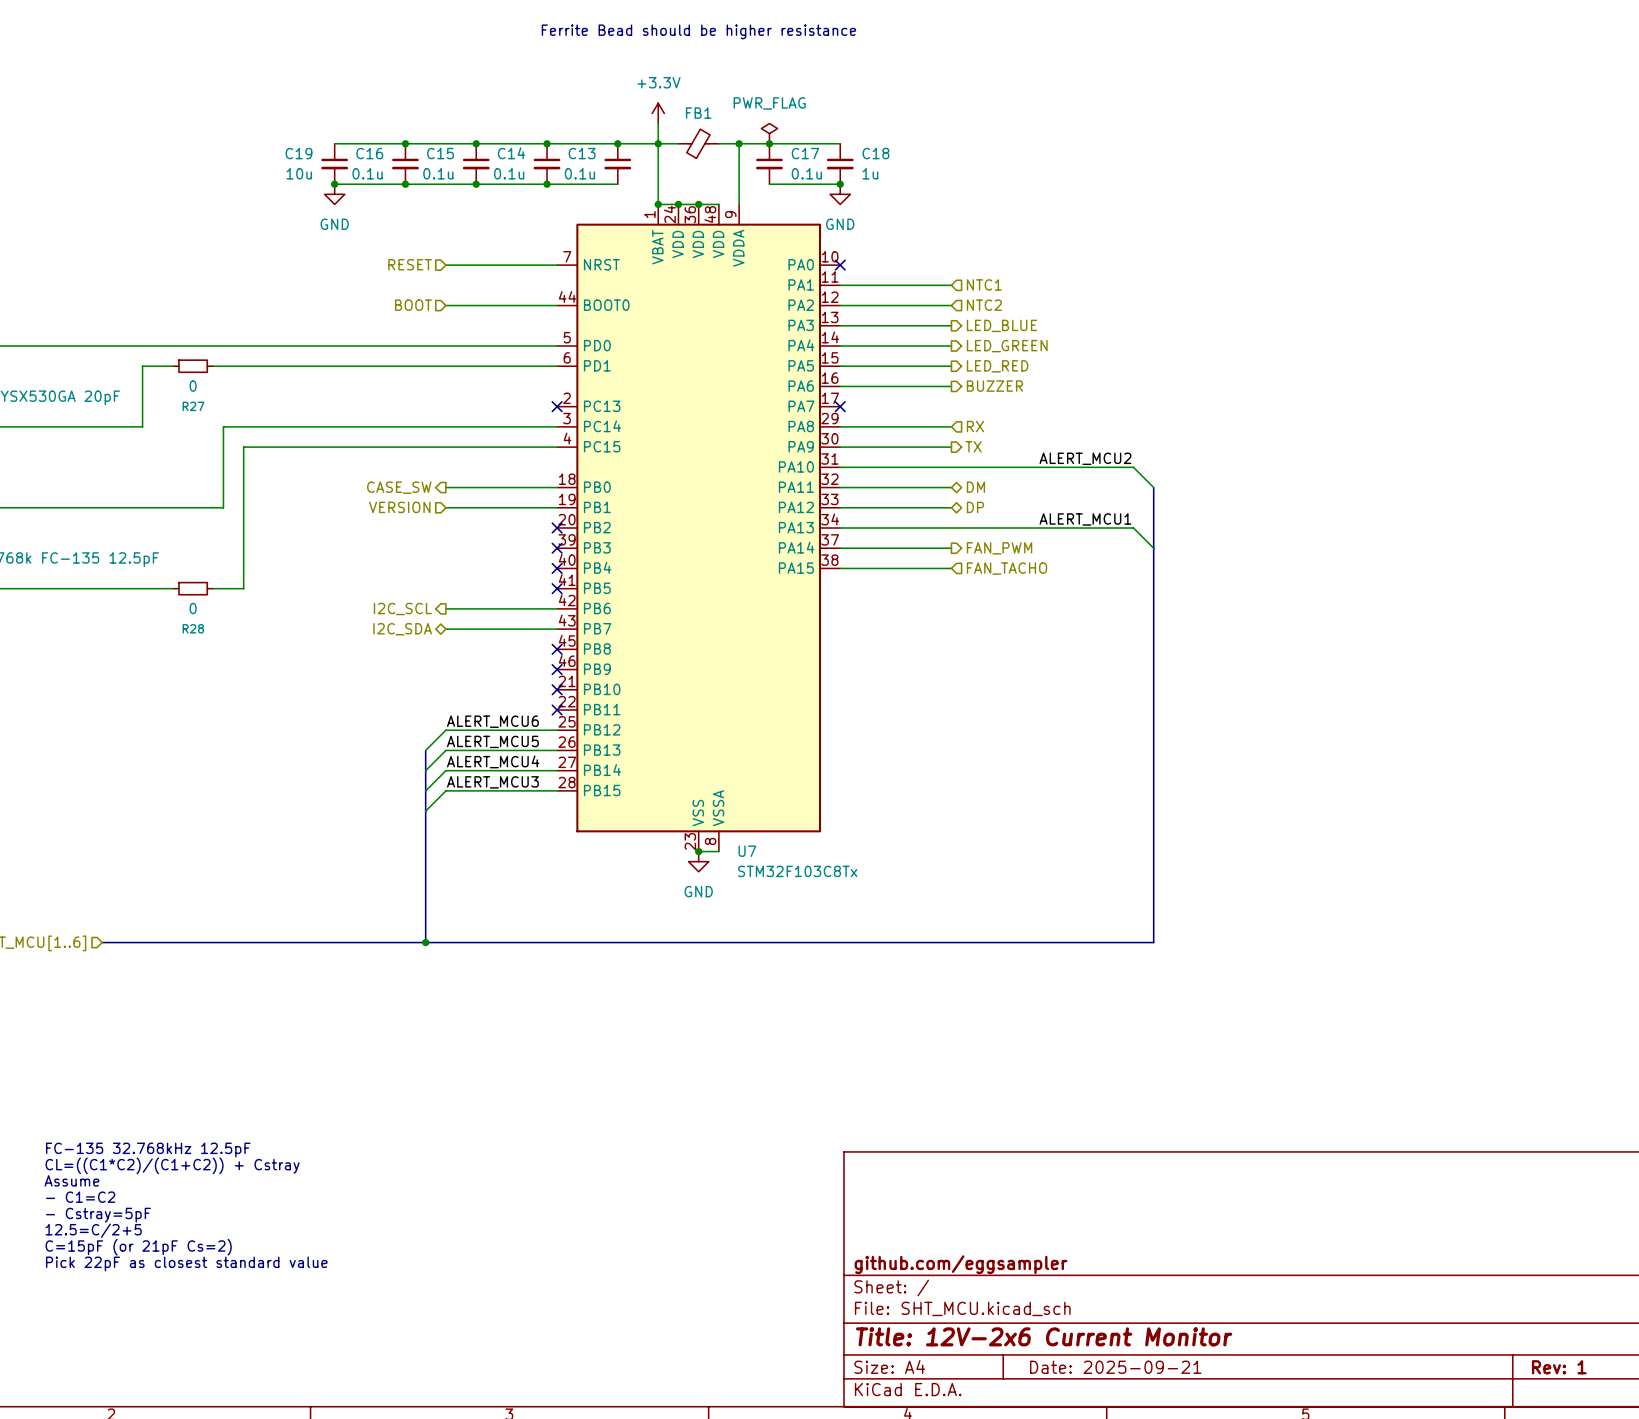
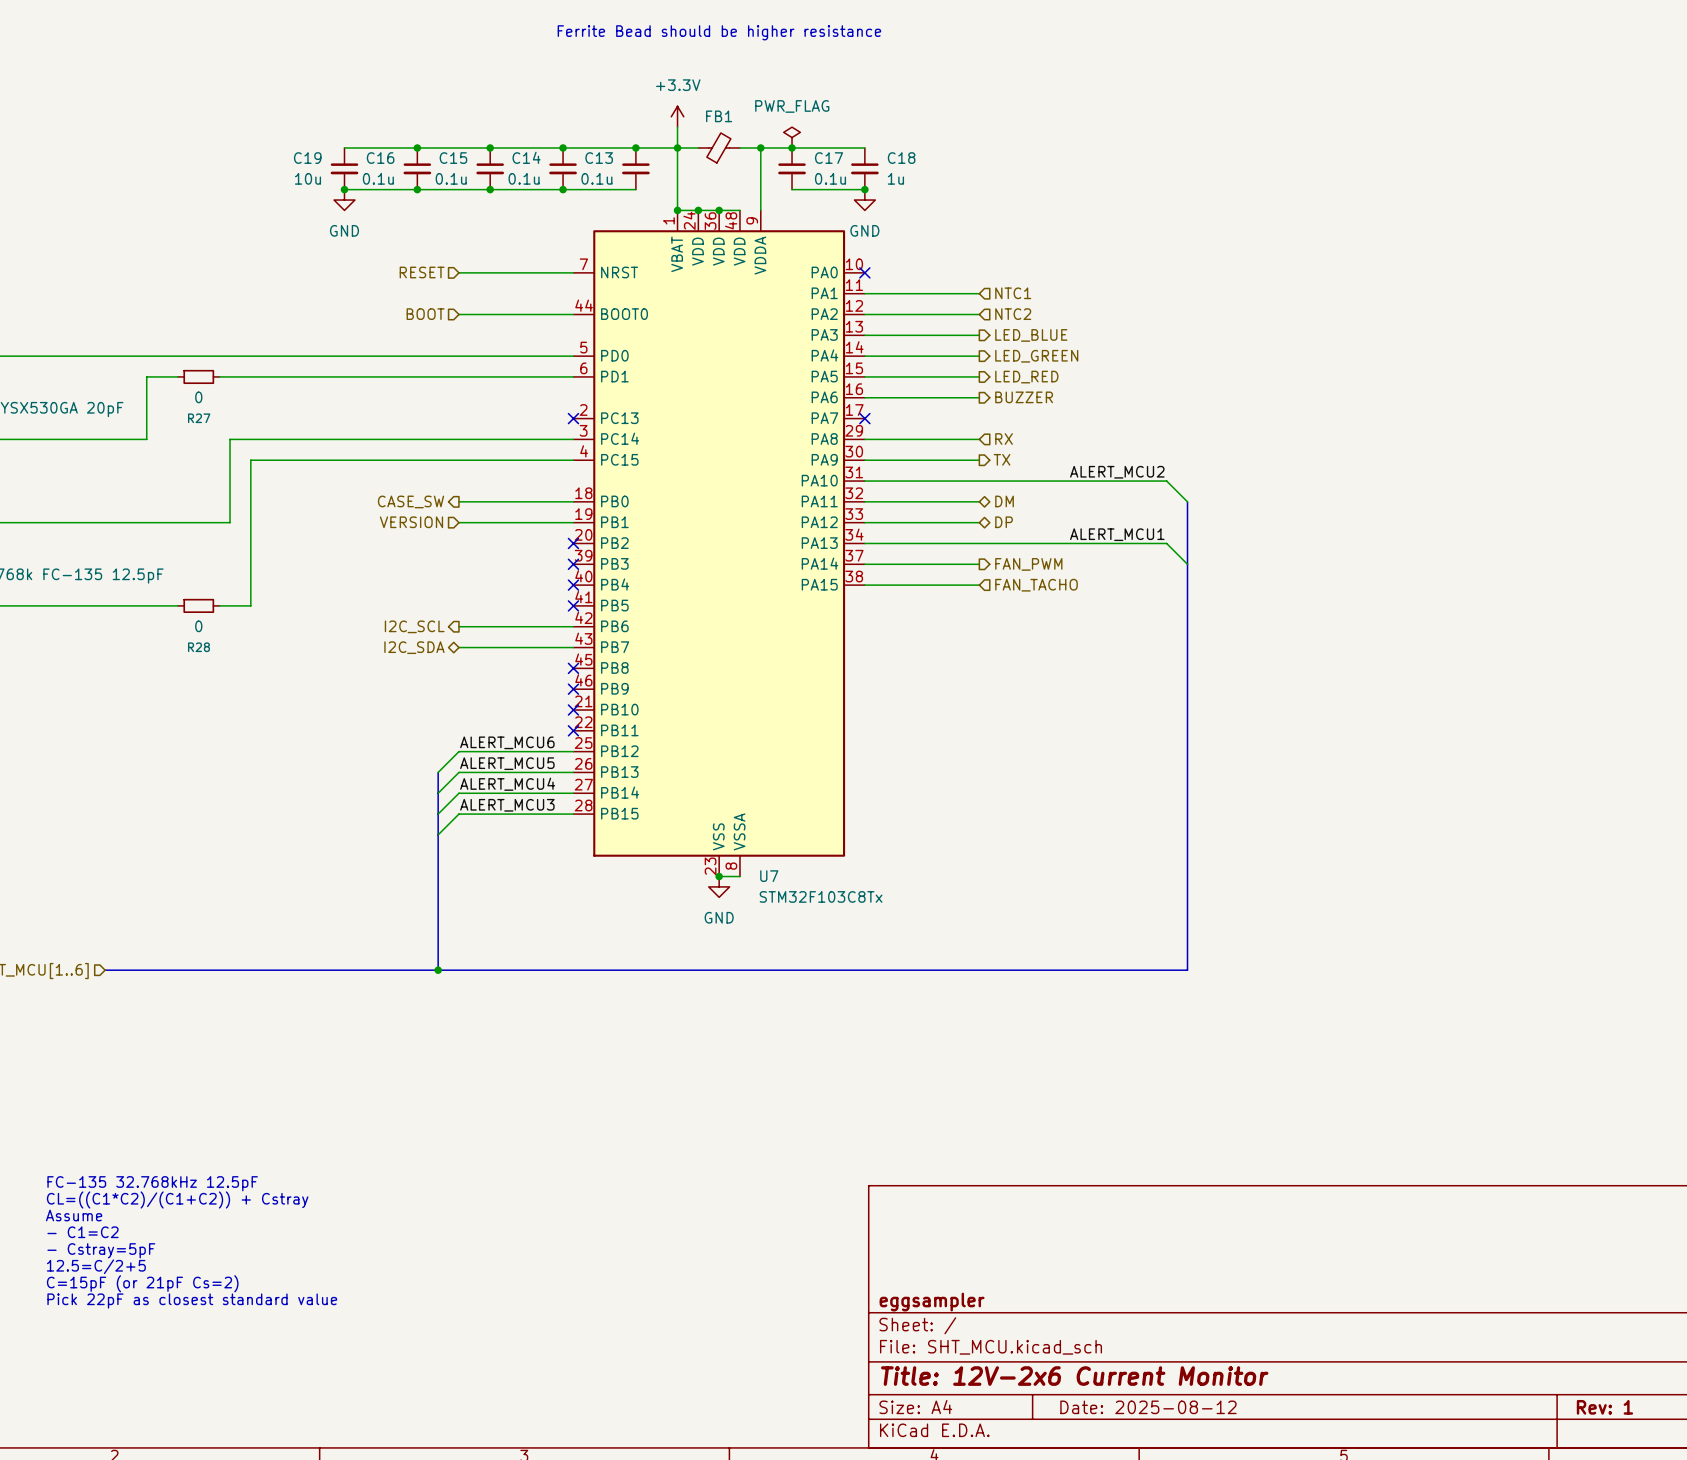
title block: github.com/eggsampler (961, 1264) -> eggsampler (932, 1302)
title block: Date: 2025-09-21 (1115, 1367) -> Date: 2025-08-12 (1148, 1407)

